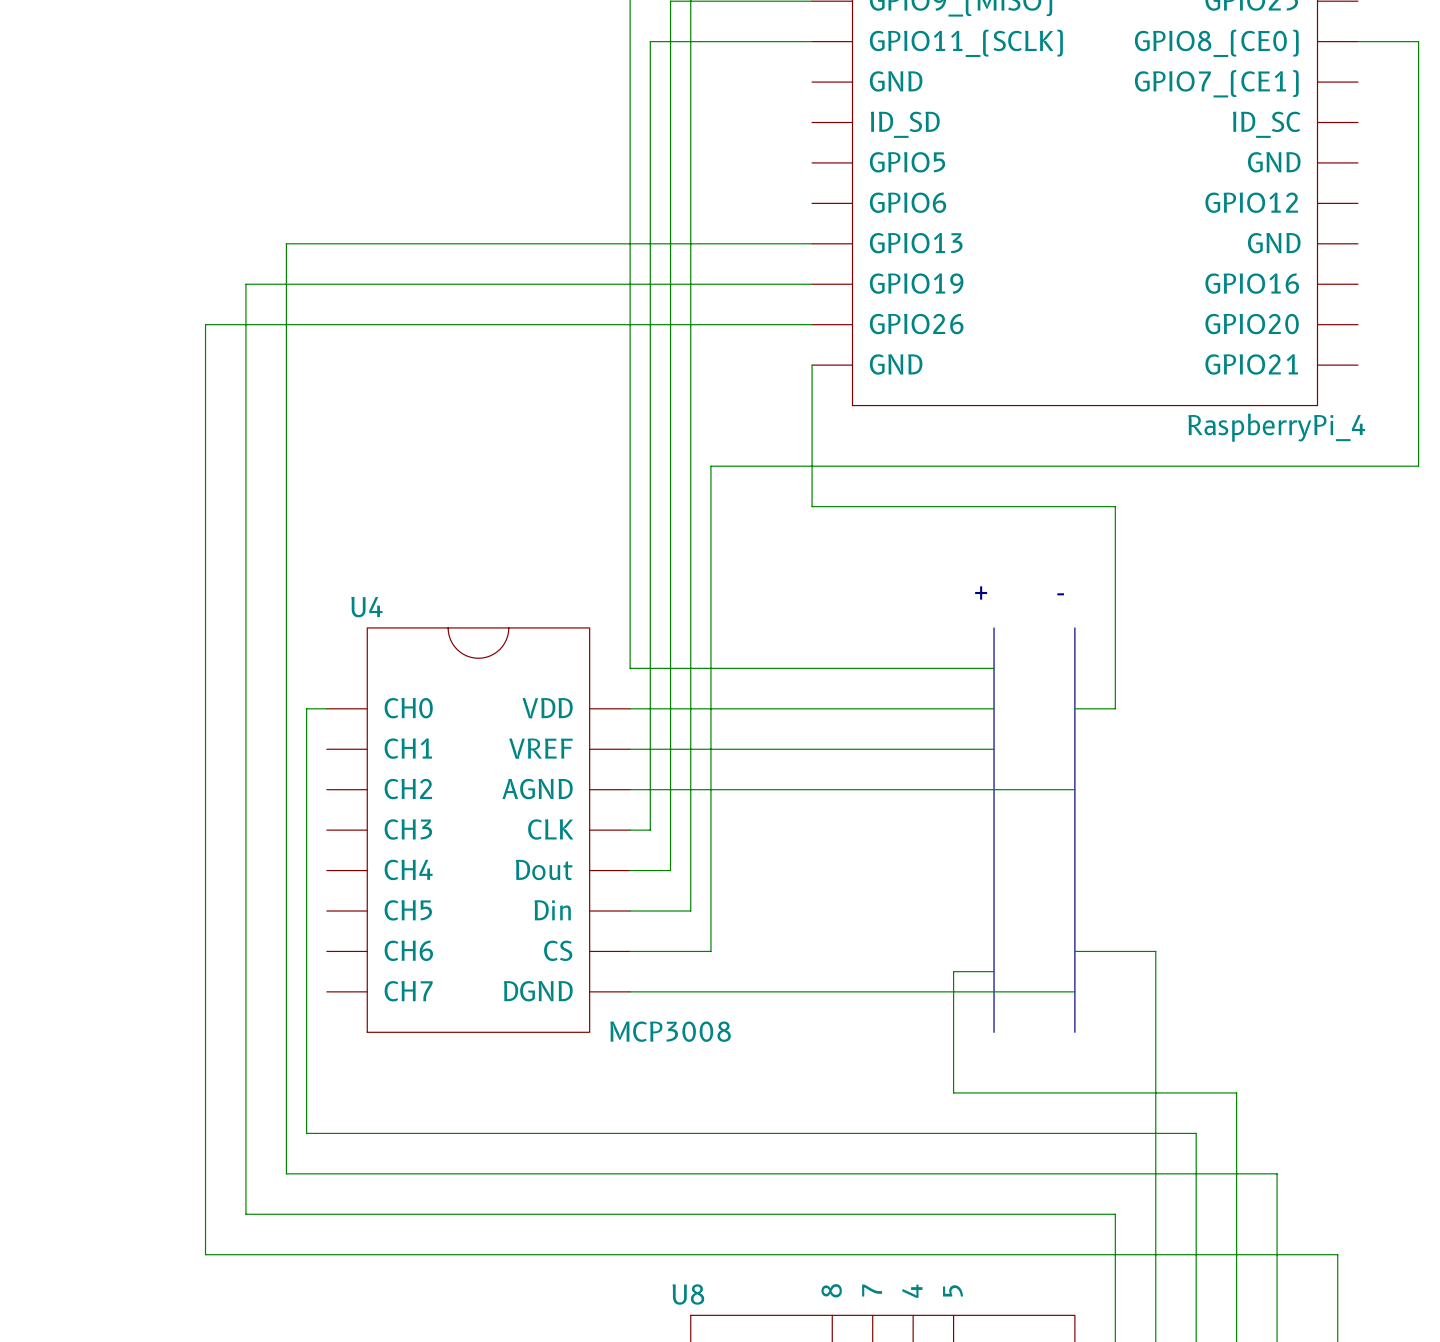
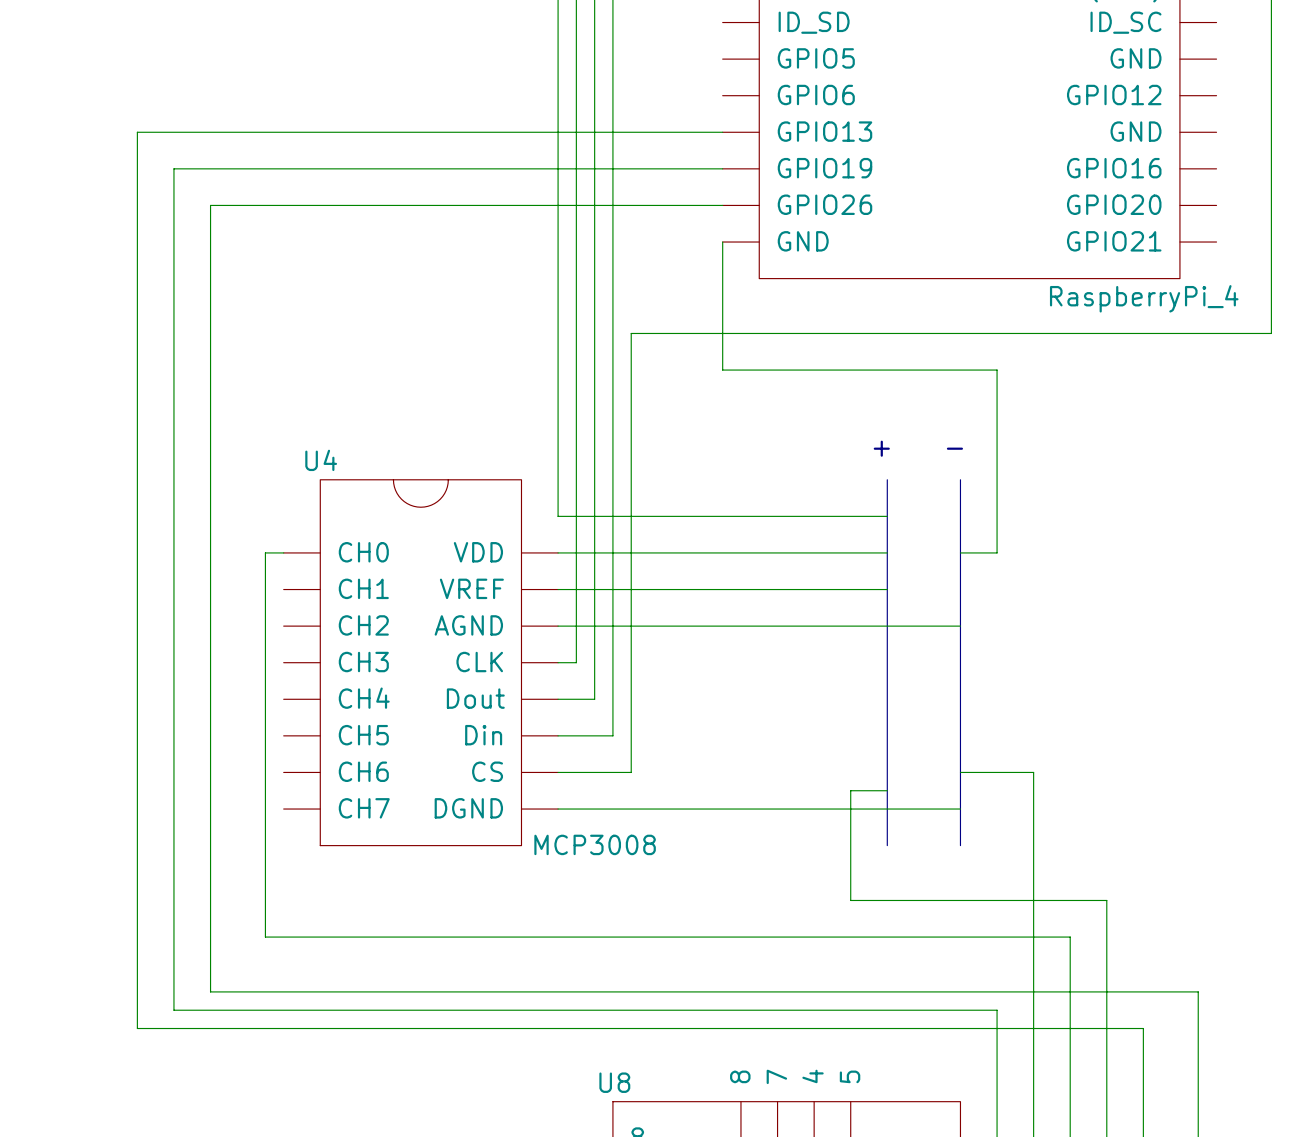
wire: (286, 243) (286, 1173) (1277, 1173) (1277, 1234) -> (247, 132) (137, 132) (137, 1028) (1143, 1028)
wire: (245, 284) (245, 324) (205, 324) -> (210, 168) (173, 168) (173, 205)
wire: (245, 1194) (245, 1214) -> (173, 1010) (210, 1010)
wire: (205, 1214) (205, 1254) (1337, 1254) -> (210, 991) (1198, 991) (1198, 1046)

